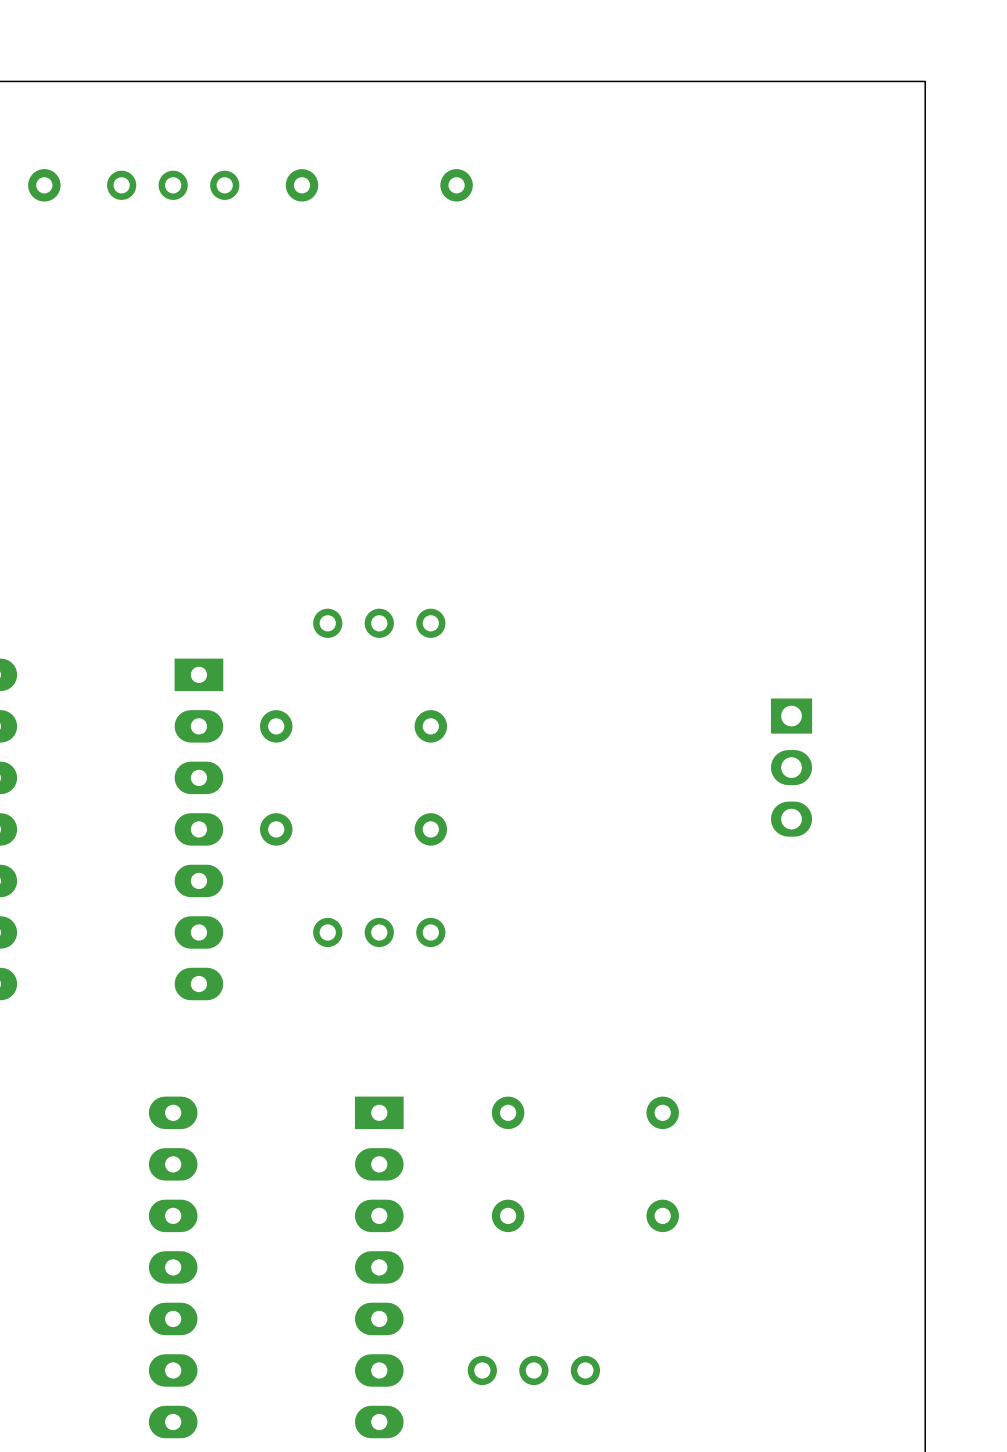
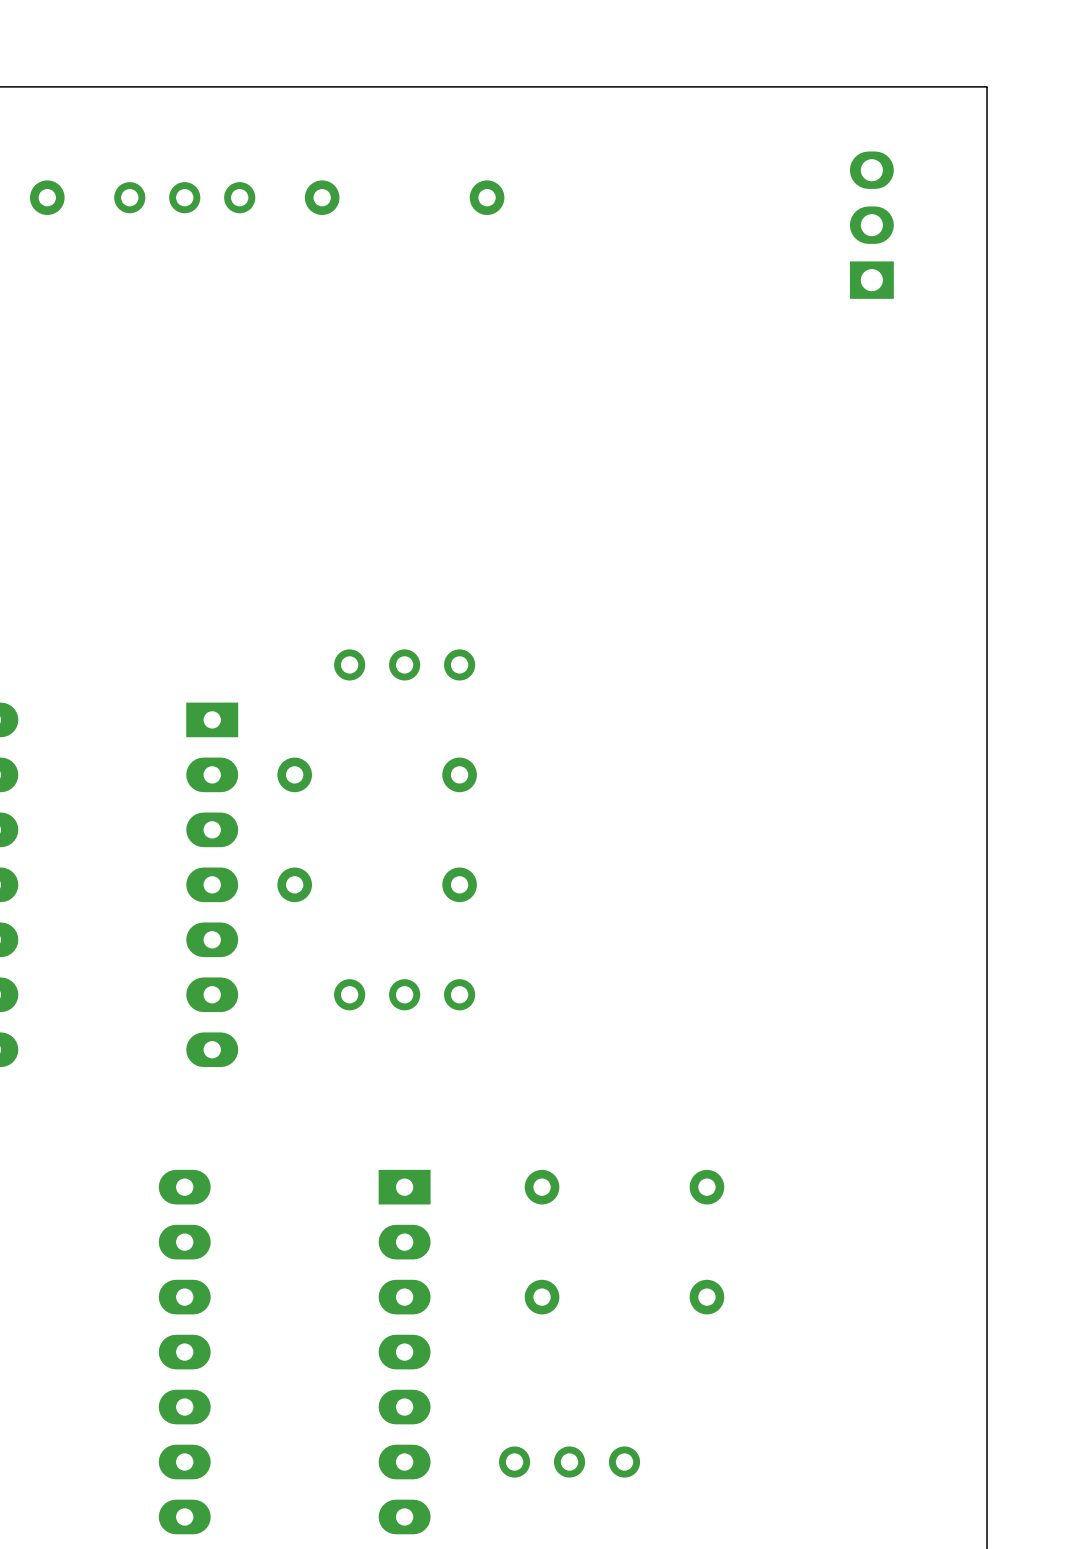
part: none -> (871, 225)
part: (791, 767) -> none

